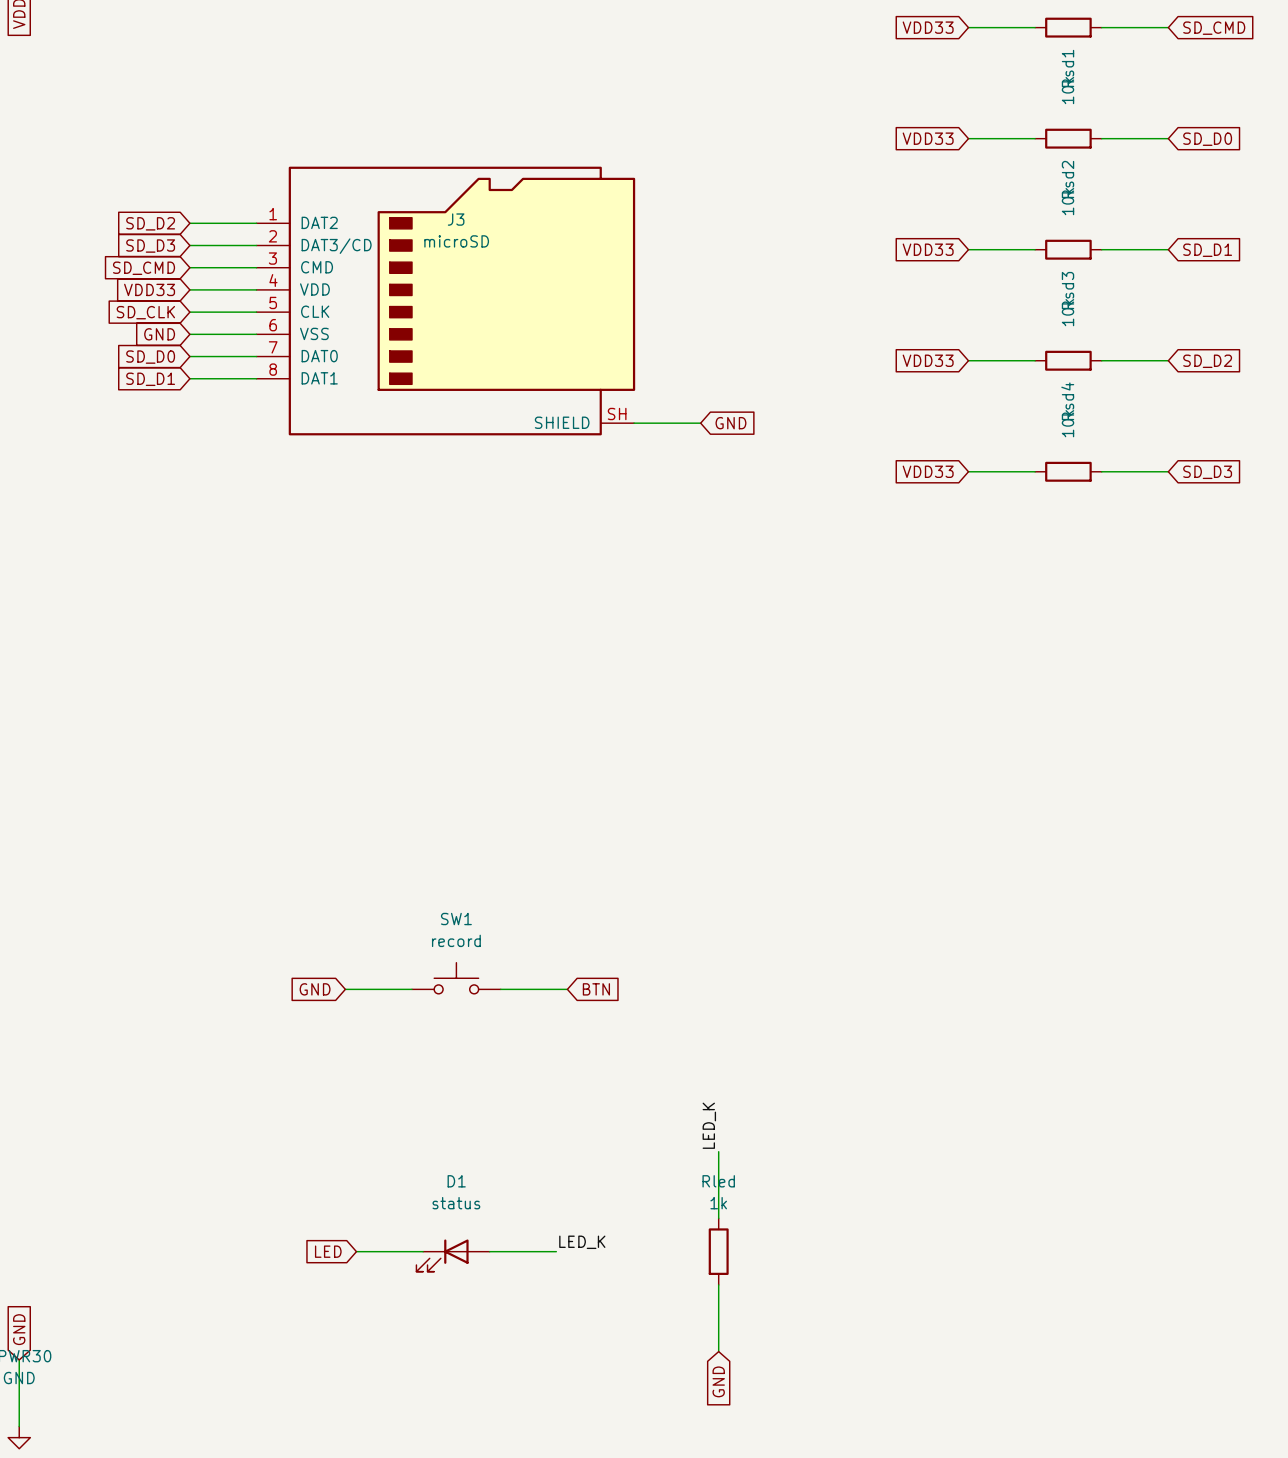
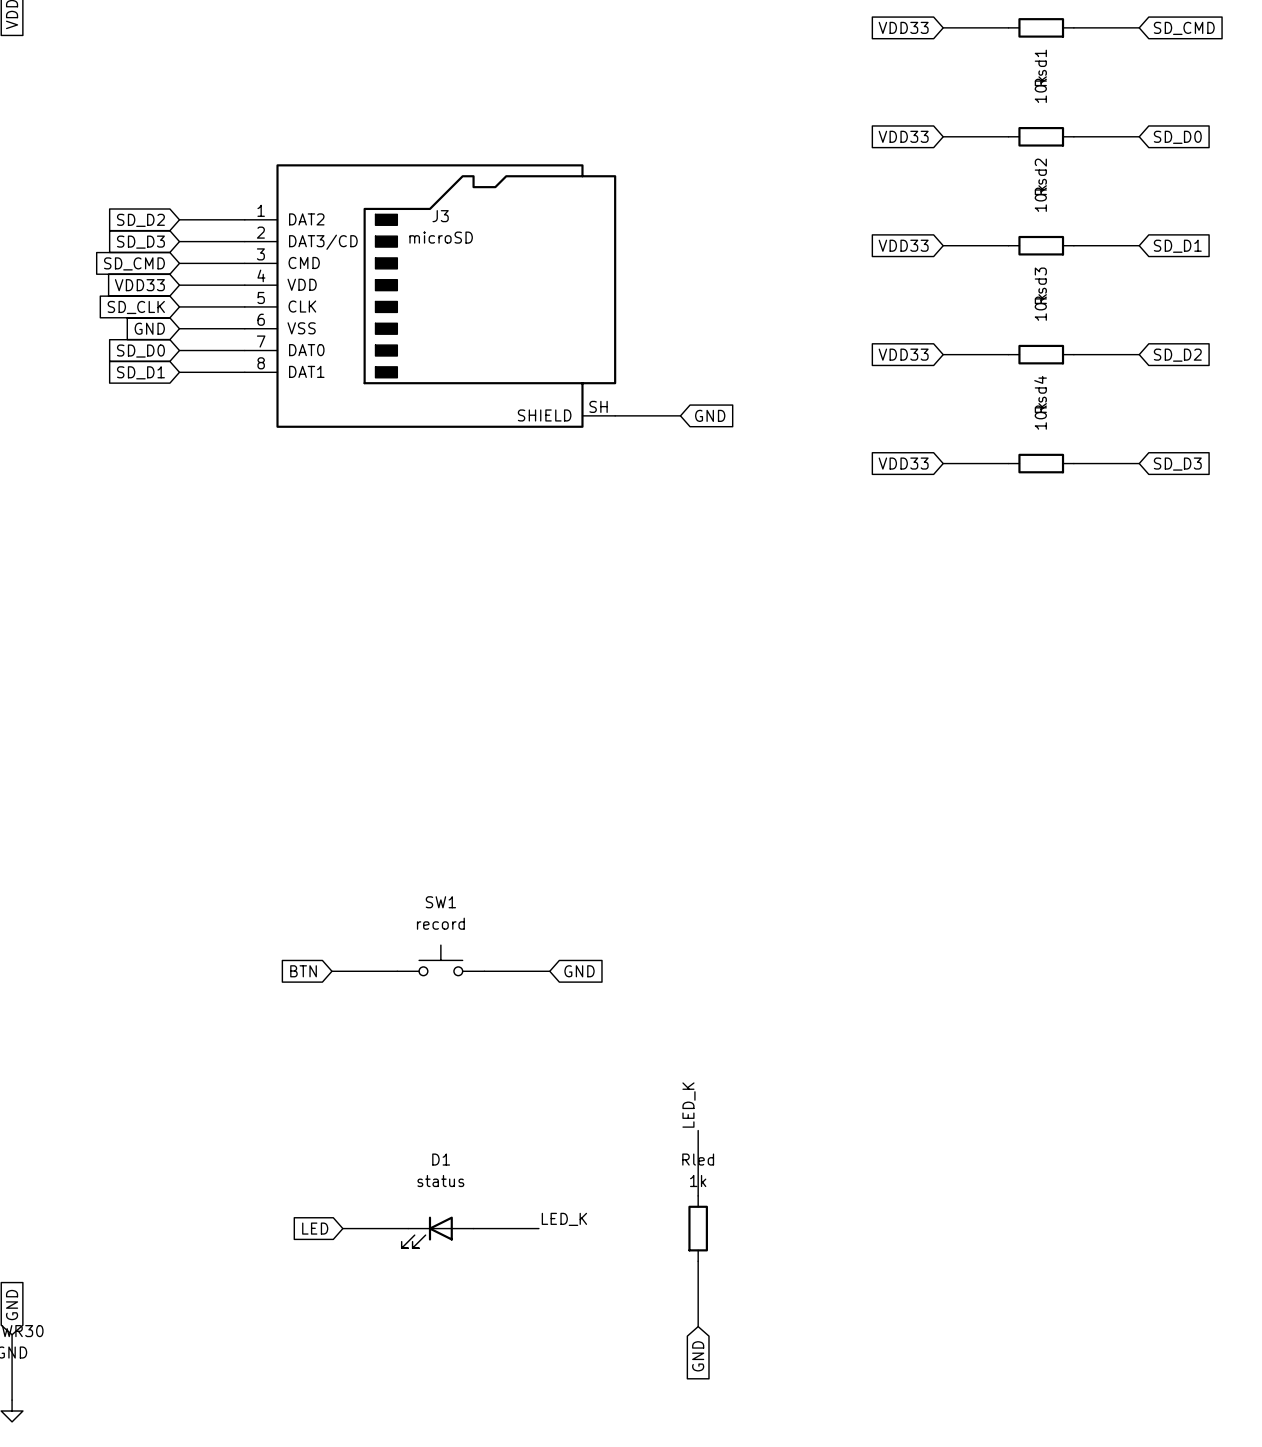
global label: GND (315, 989) -> BTN (303, 971)
global label: BTN (596, 989) -> GND (579, 971)

